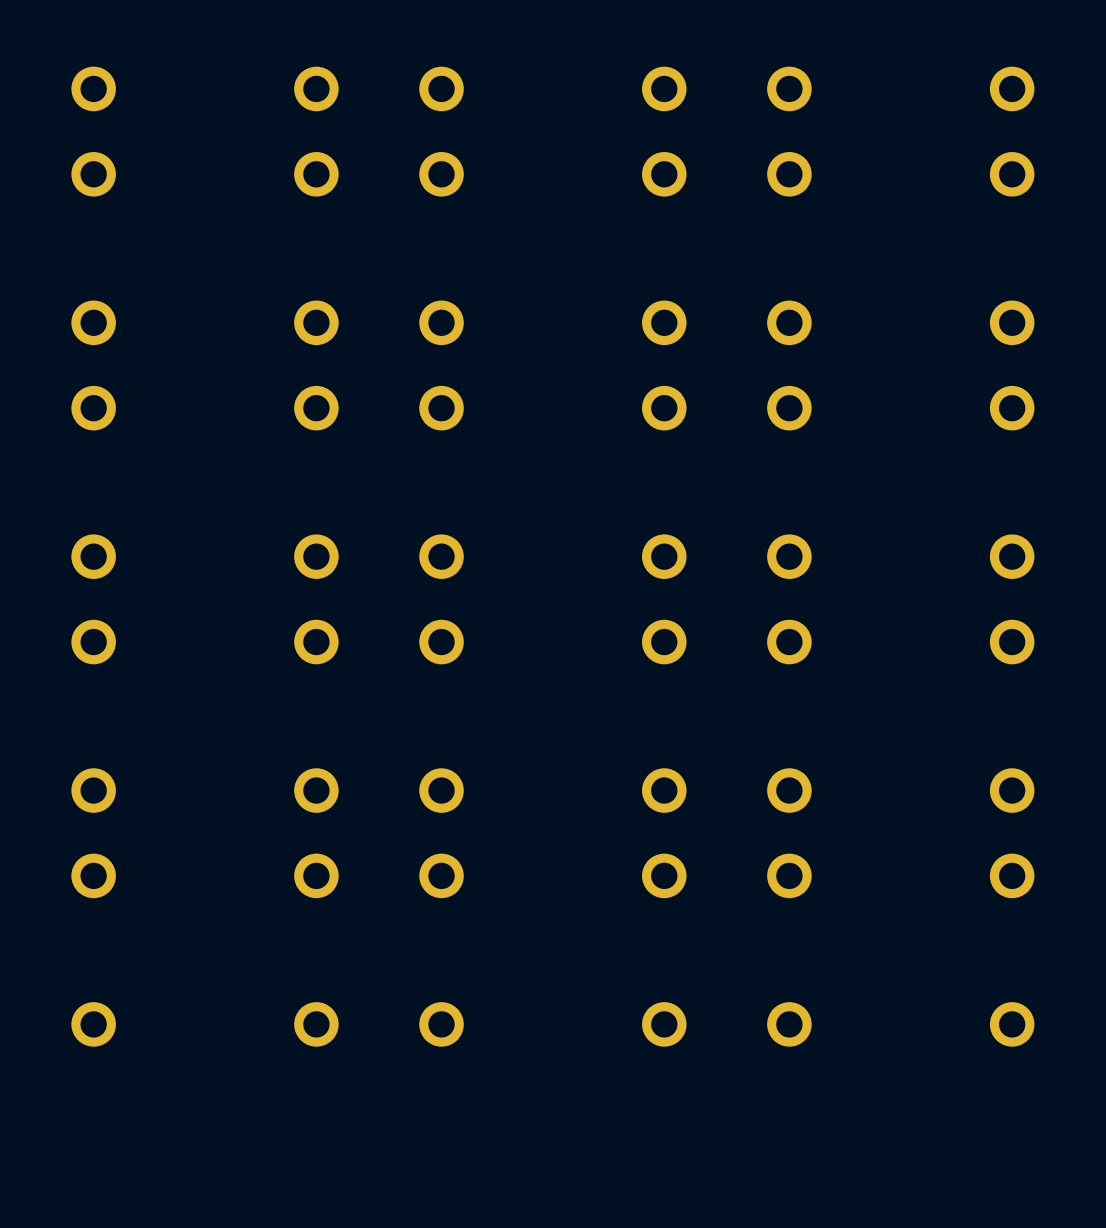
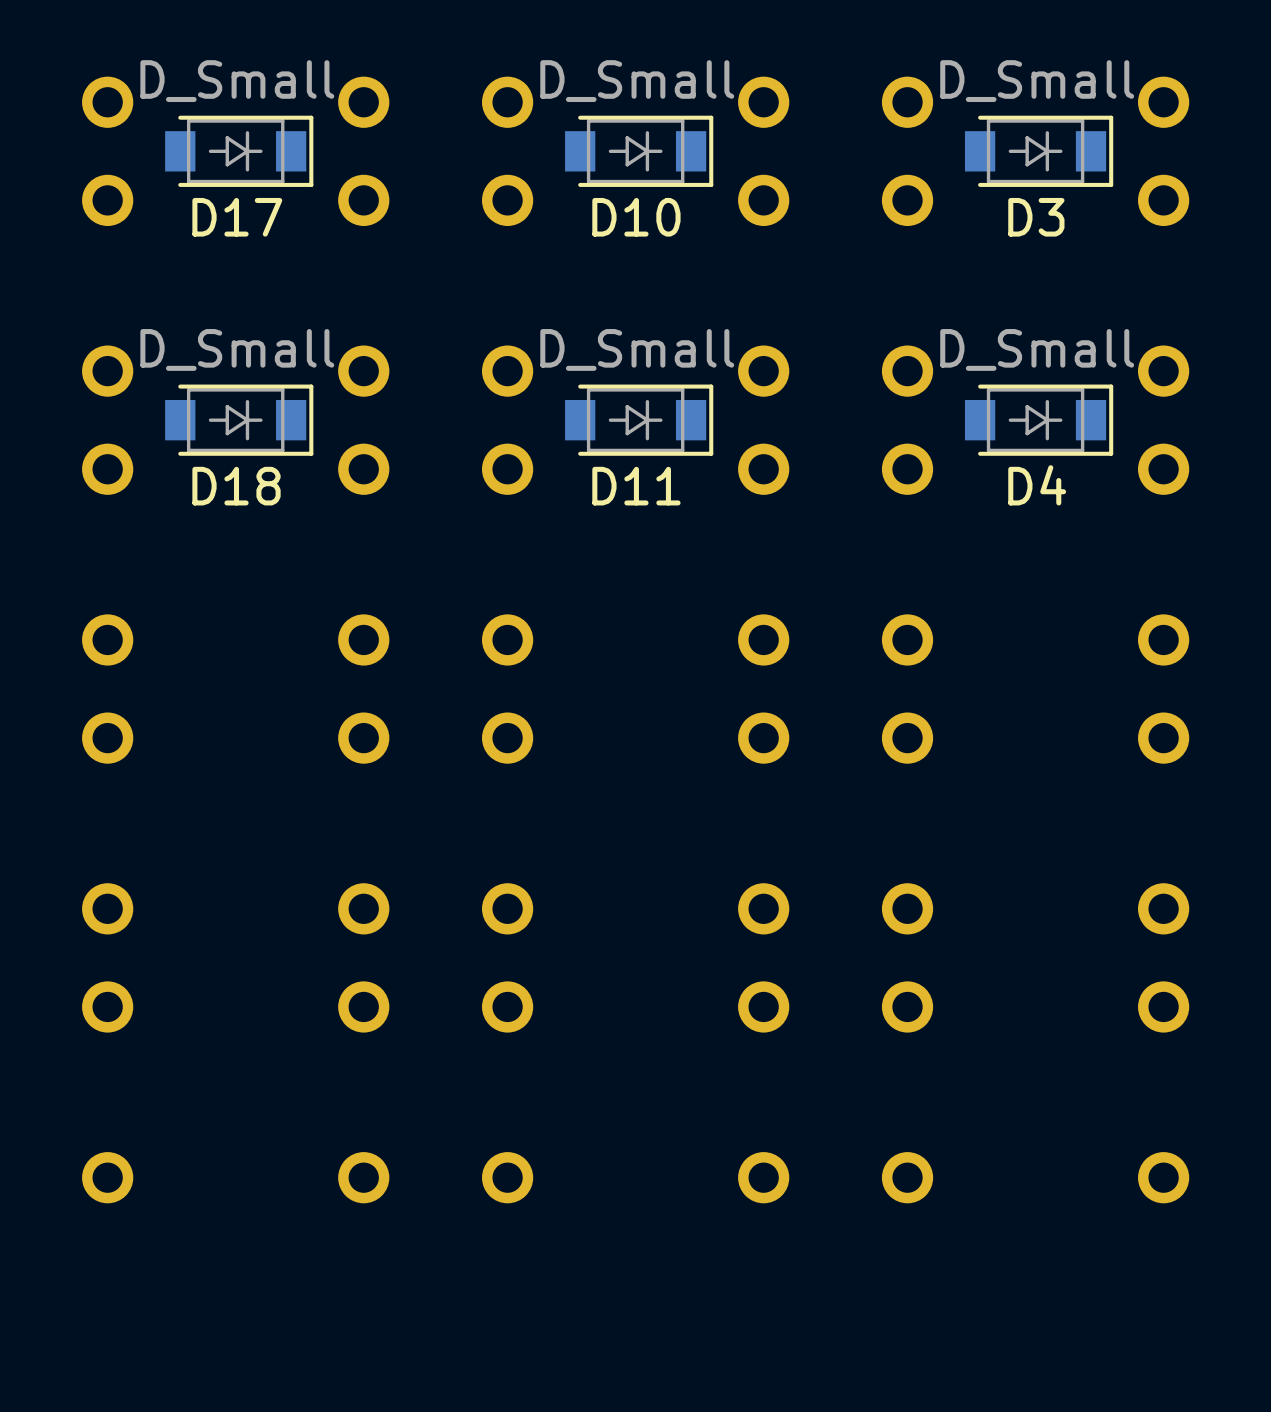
D17: none -> D_Small (239, 151)
D10: none -> D_Small (639, 151)
D3: none -> D_Small (1039, 151)
D18: none -> D_Small (239, 420)
D11: none -> D_Small (639, 420)
D4: none -> D_Small (1039, 420)

